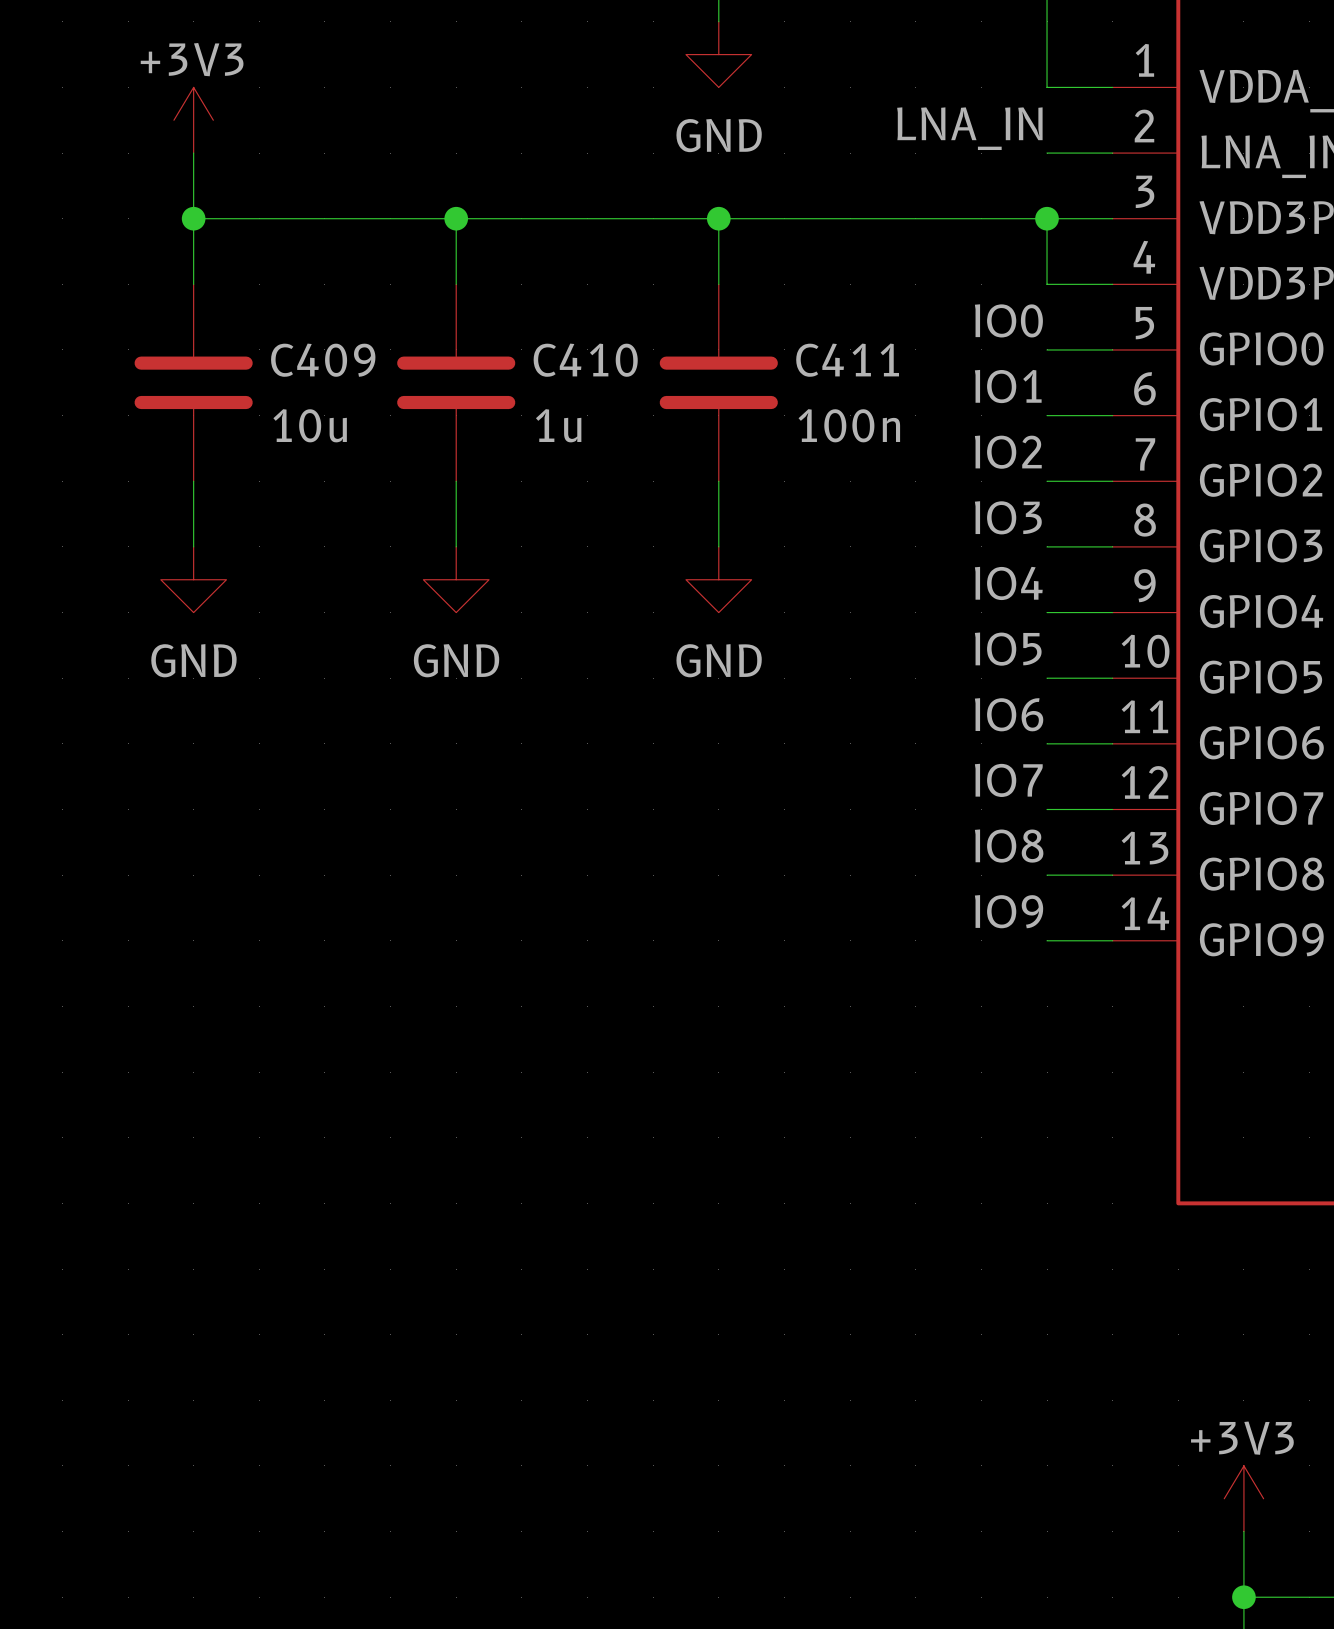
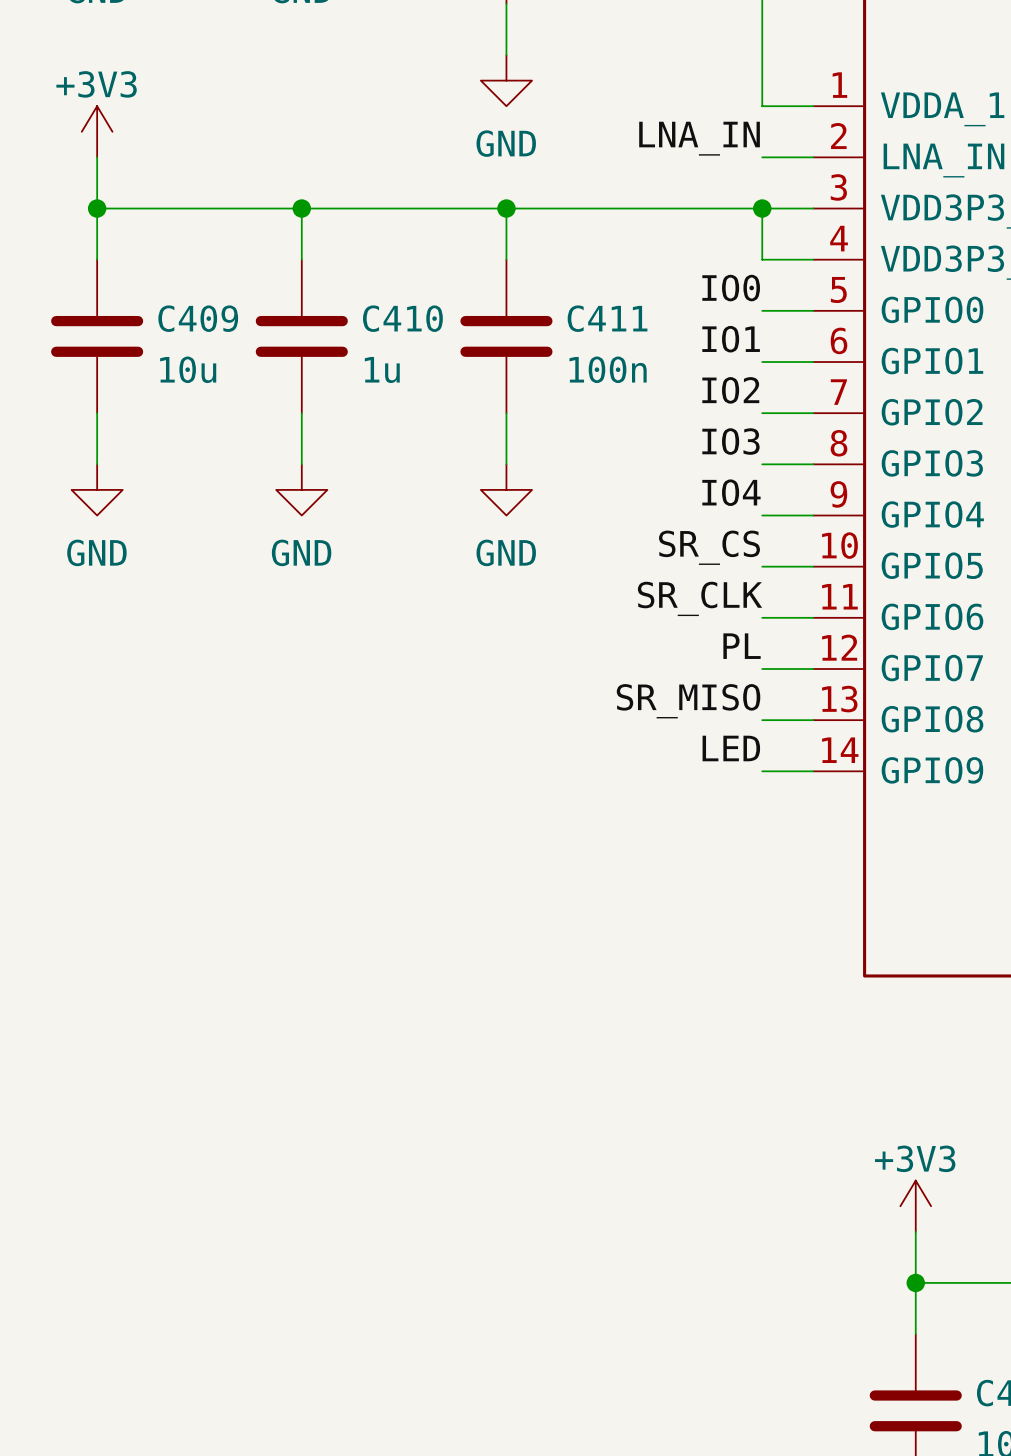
label: IO5 (1008, 649) -> SR_CS (709, 547)
label: IO6 (1009, 714) -> SR_CLK (700, 598)
label: IO7 (1008, 780) -> PL (742, 646)
label: IO8 (1009, 846) -> SR_MISO (688, 701)
label: IO9 (1009, 911) -> LED (731, 748)

